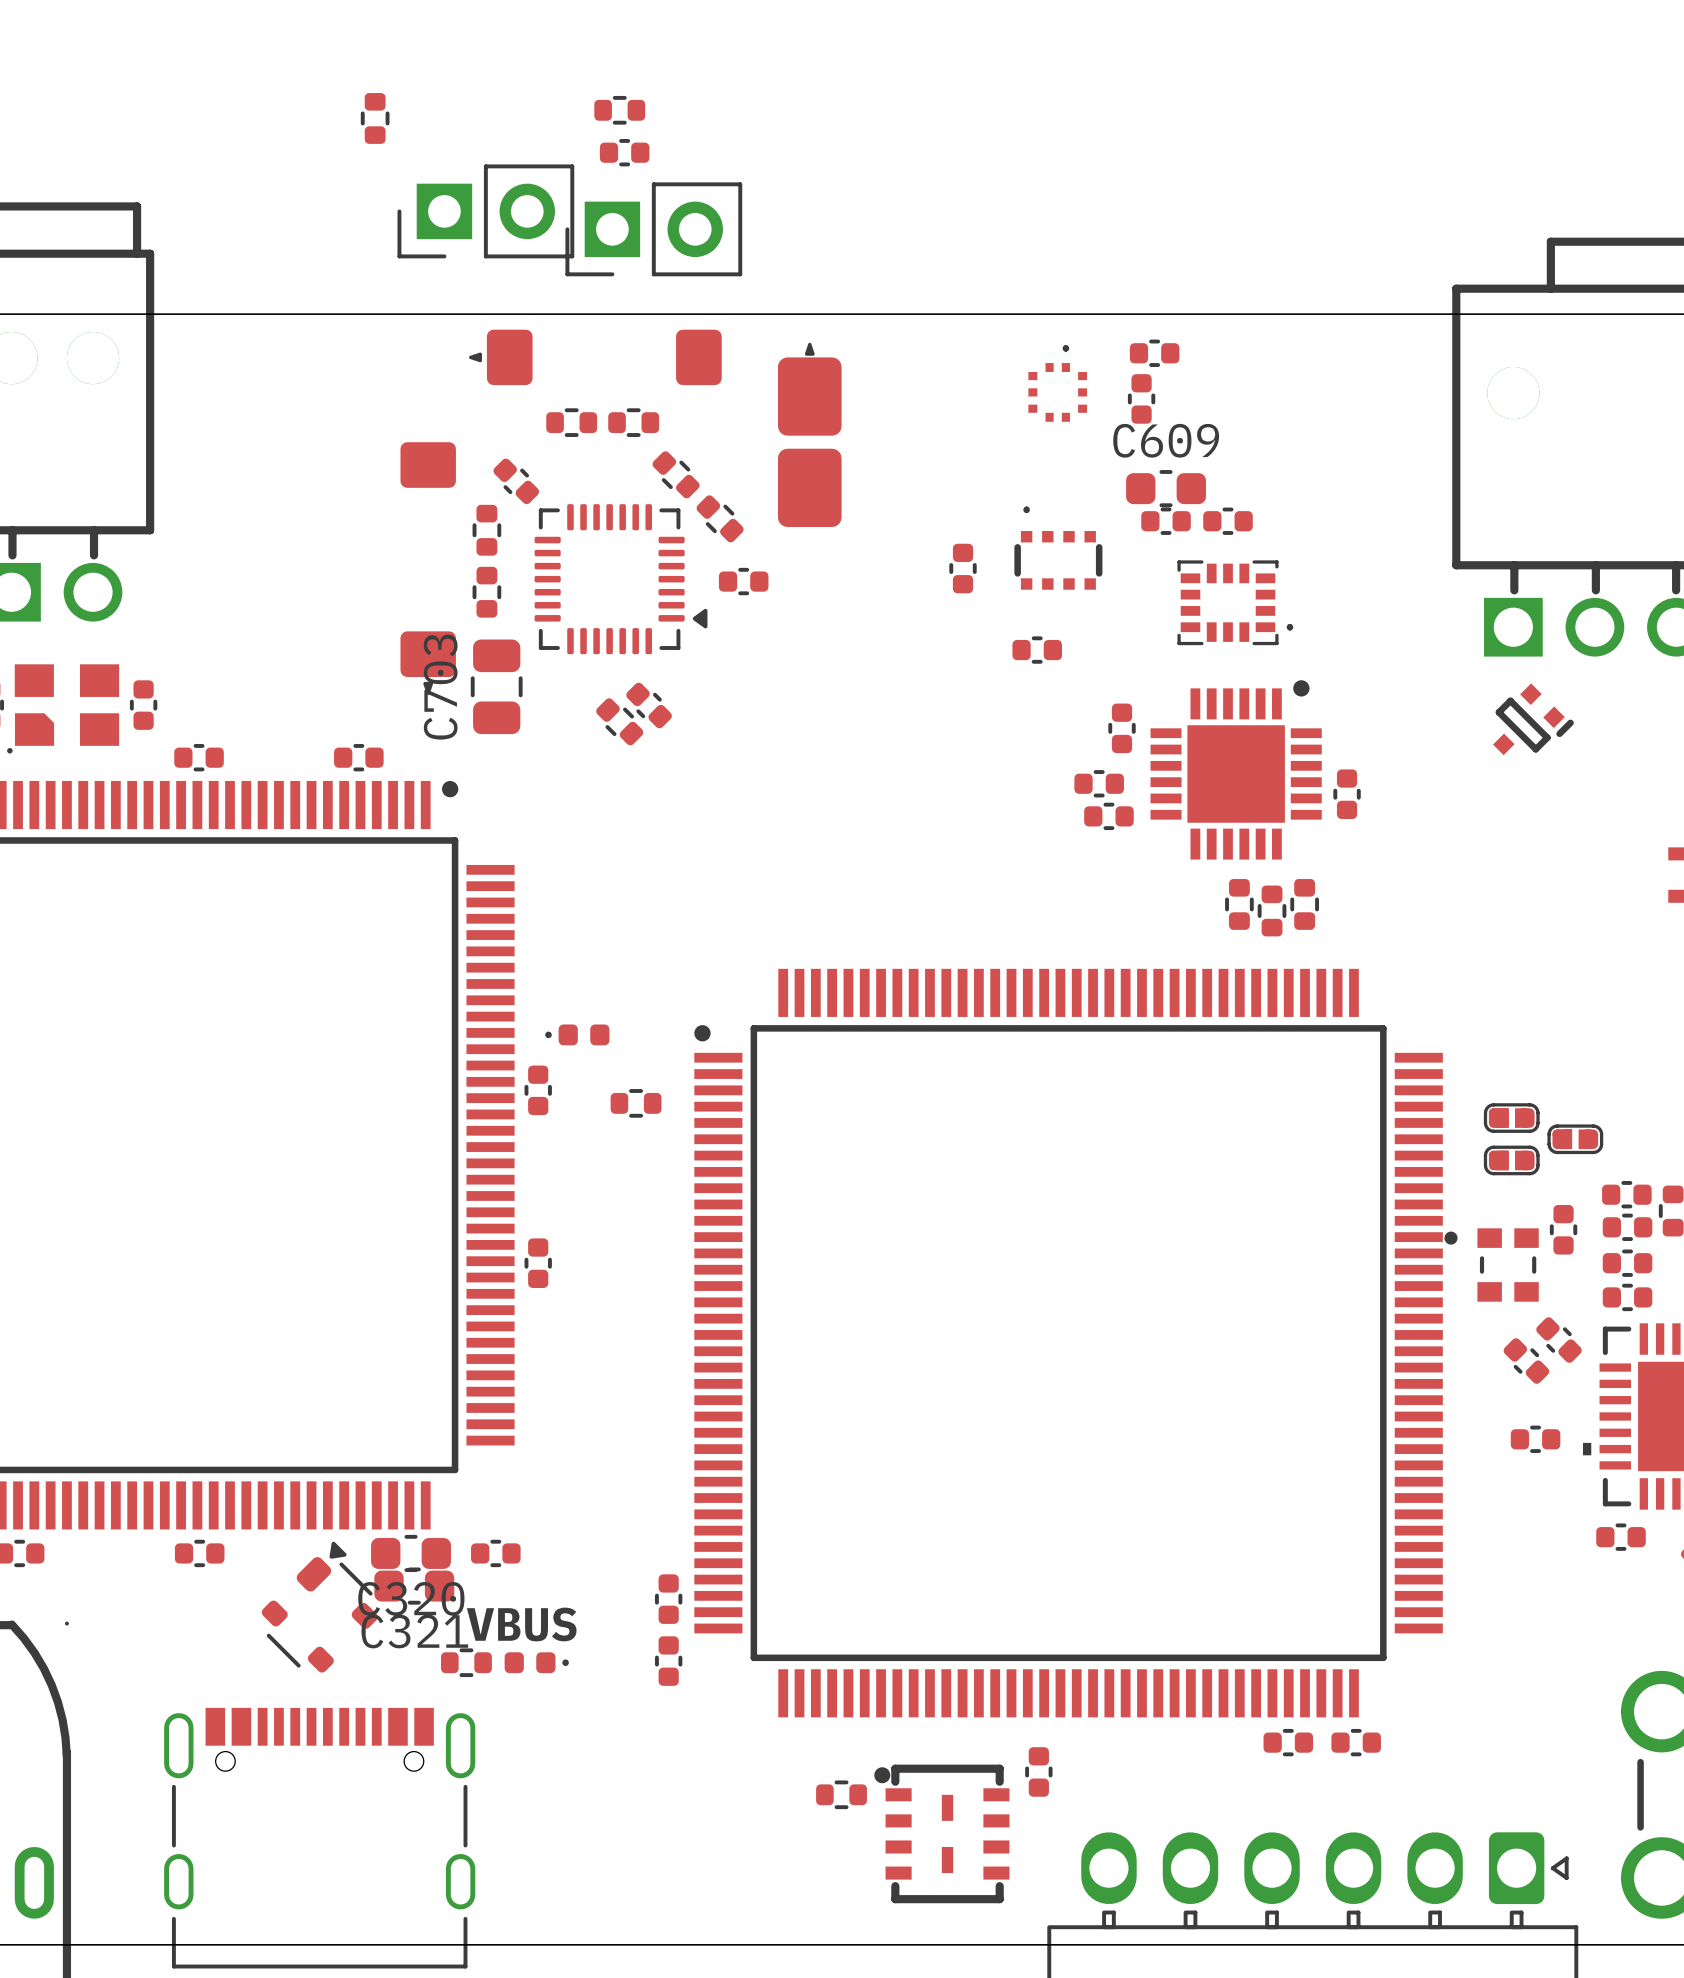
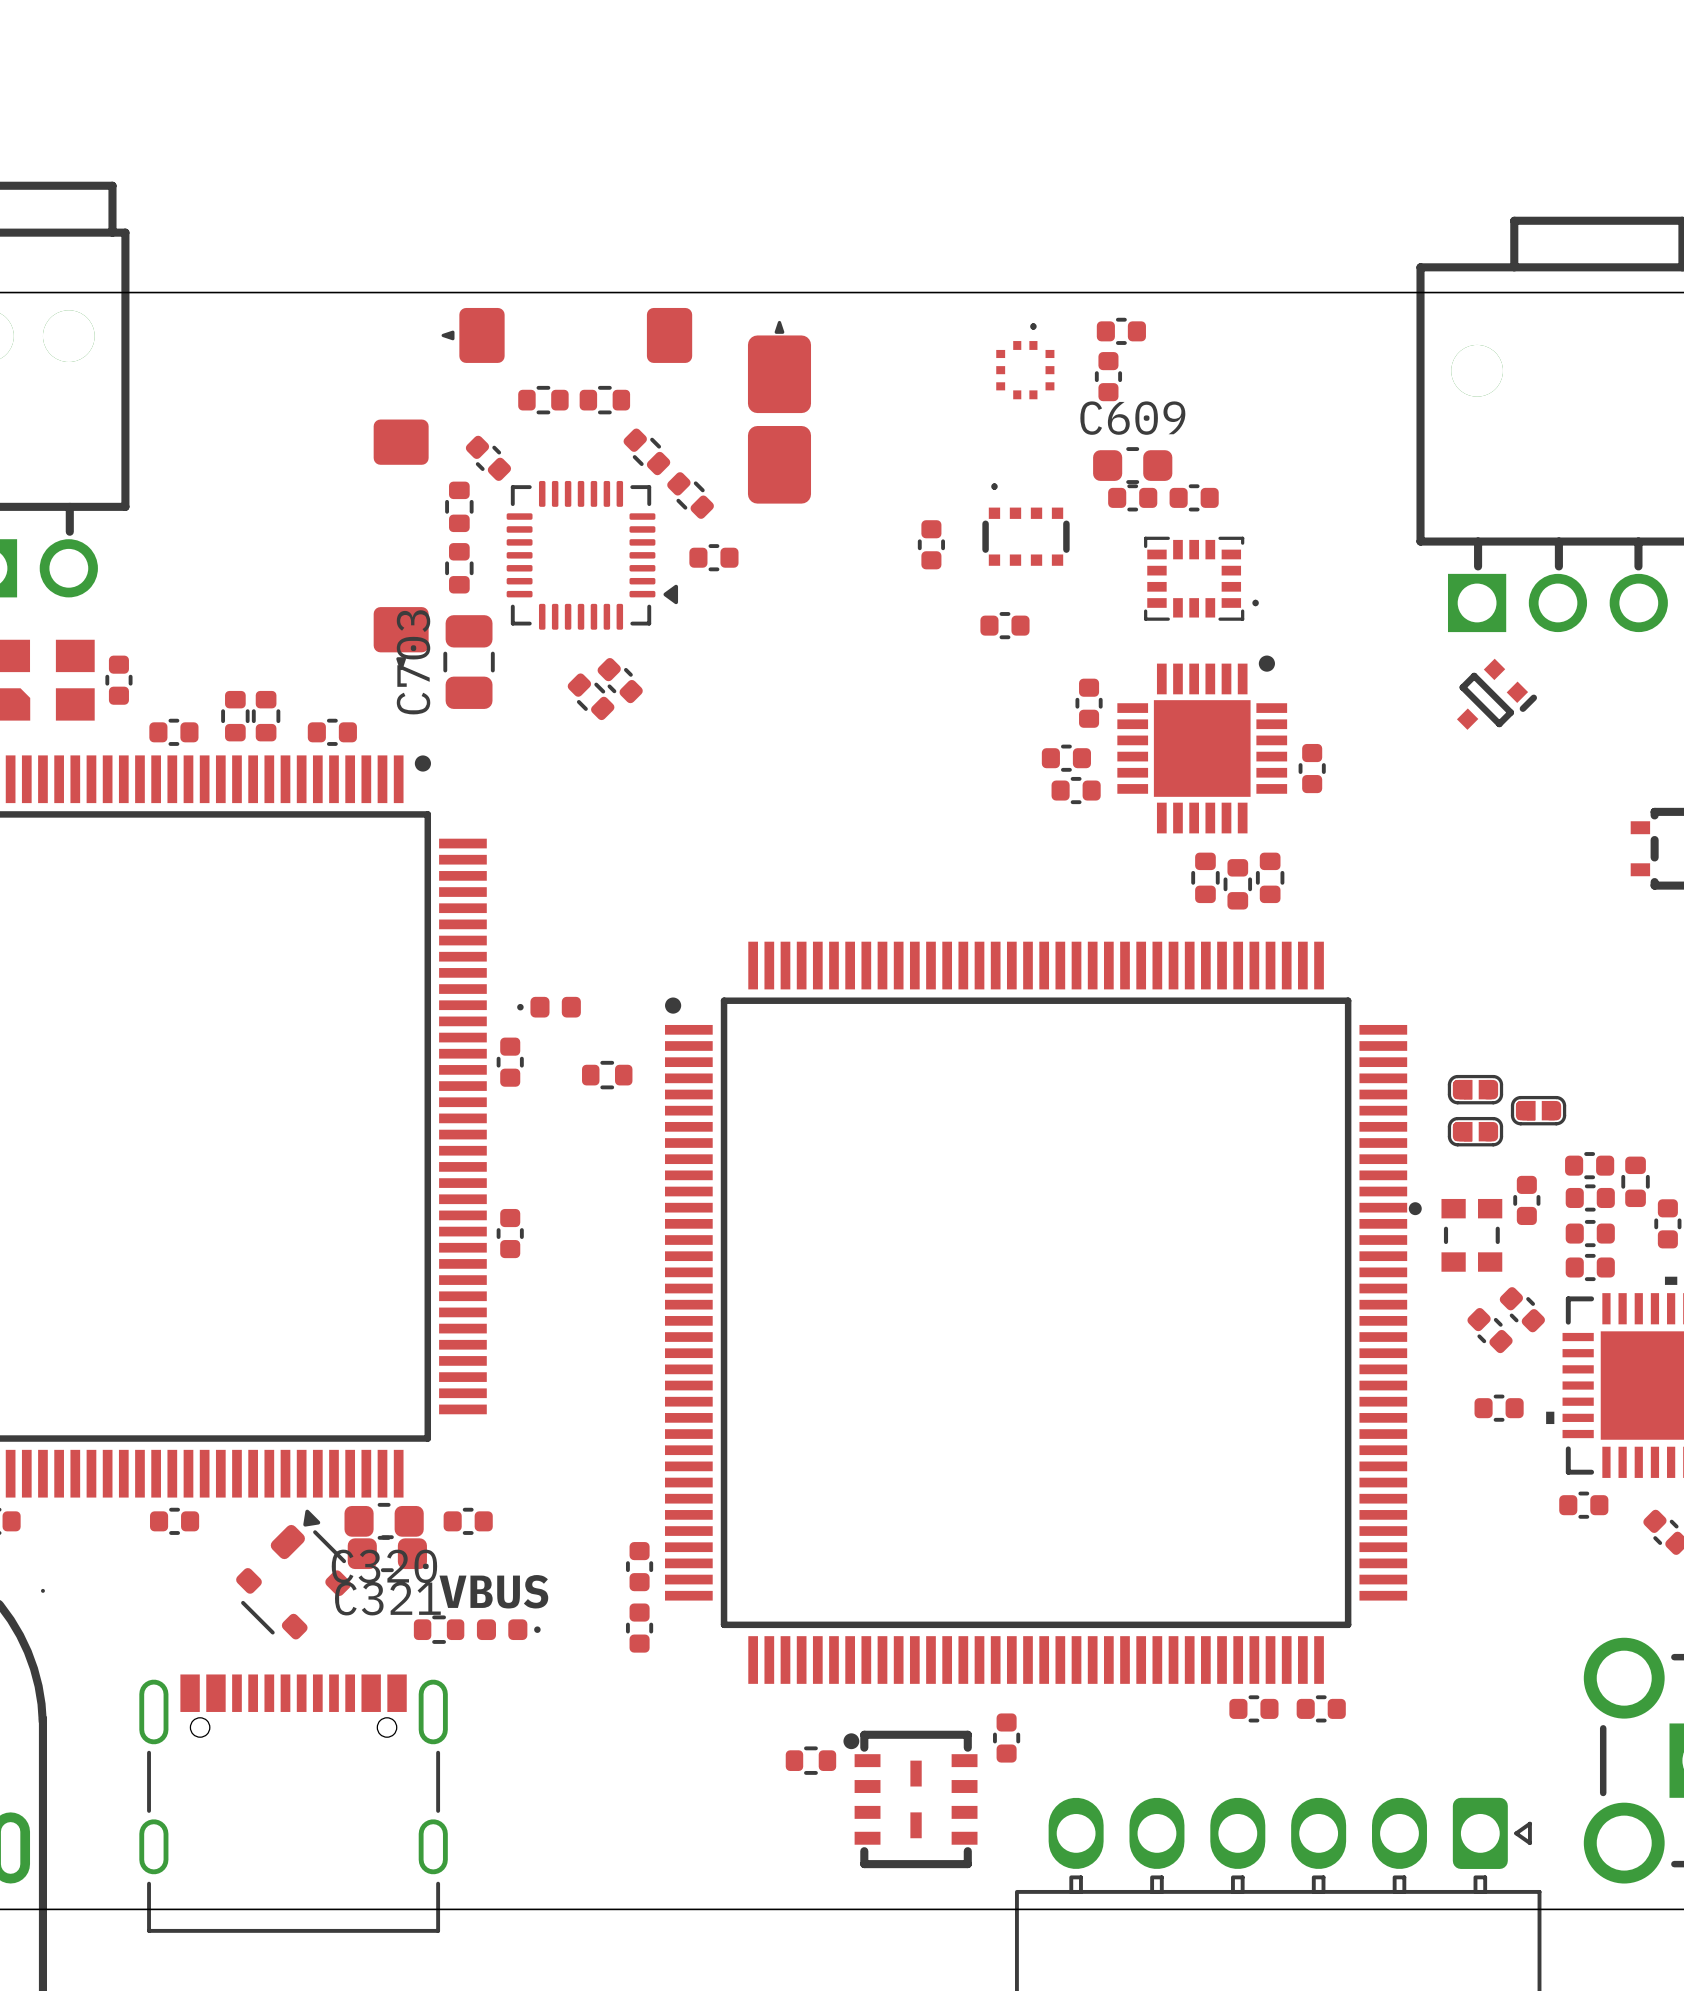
part: (619, 110) -> none
part: (375, 118) -> none
part: (624, 152) -> none
part: (485, 211) -> none
part: (653, 229) -> none
part: none -> (235, 716)
part: none -> (266, 716)

